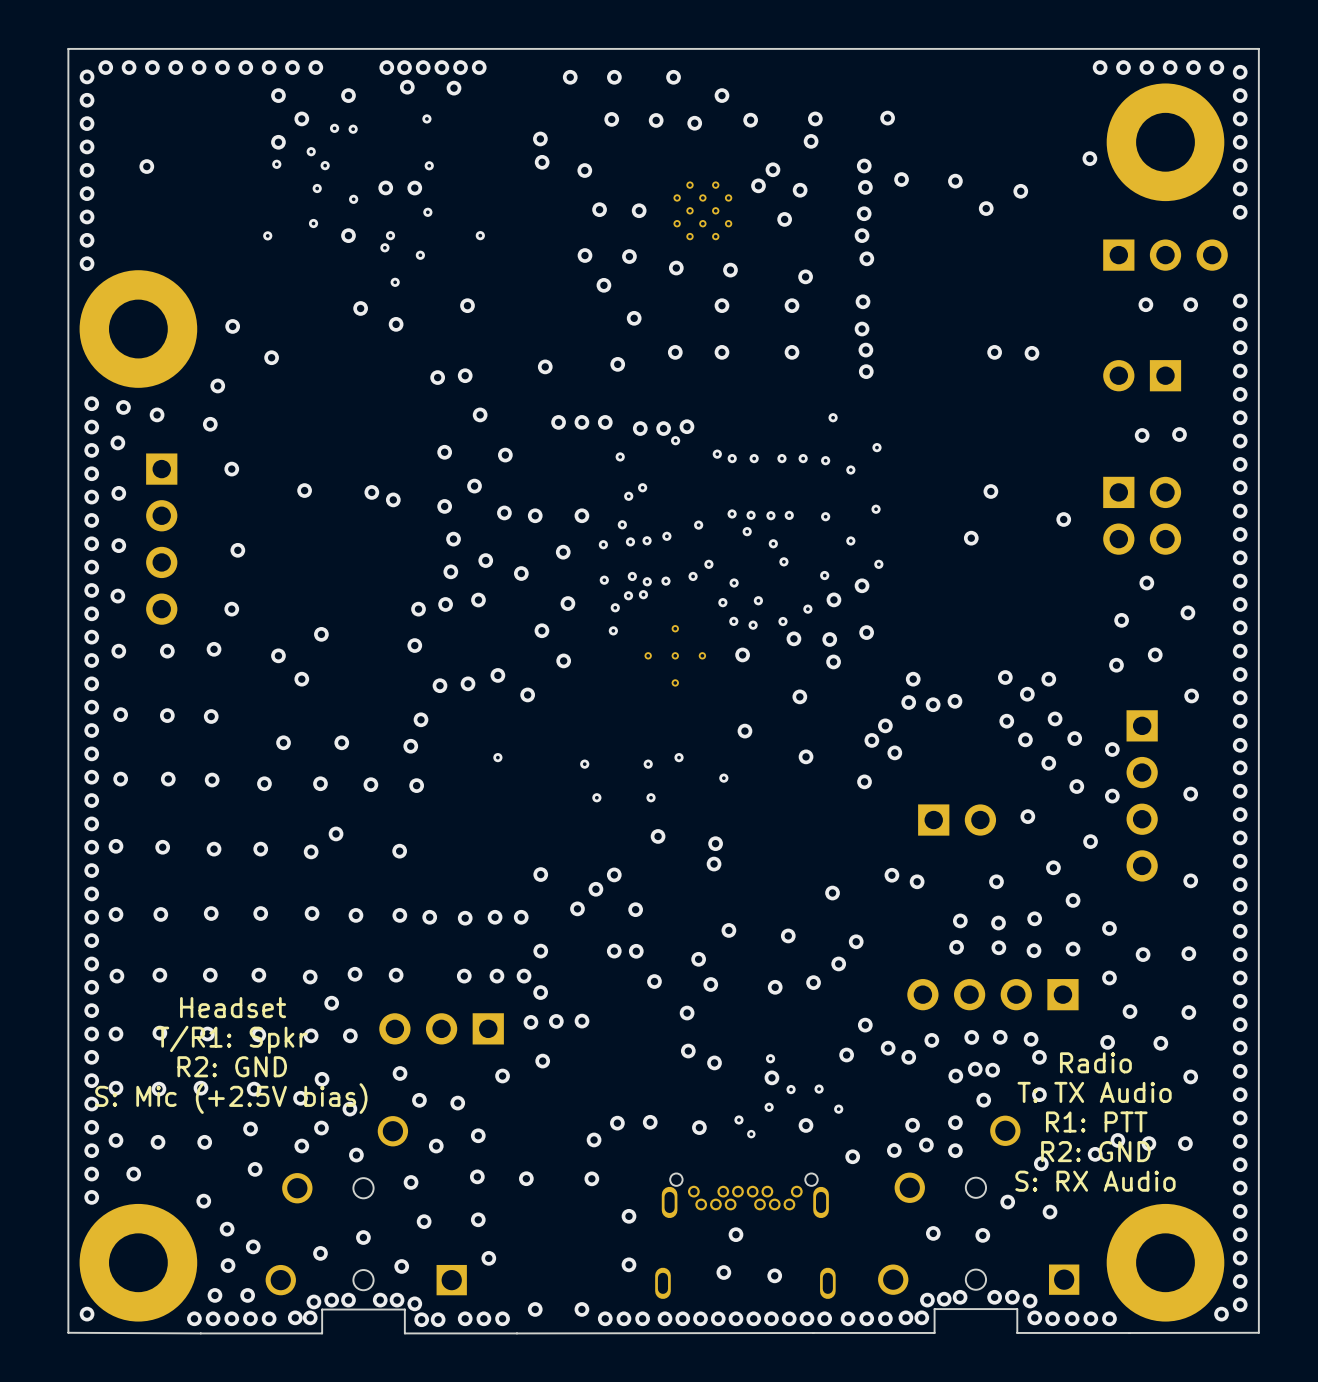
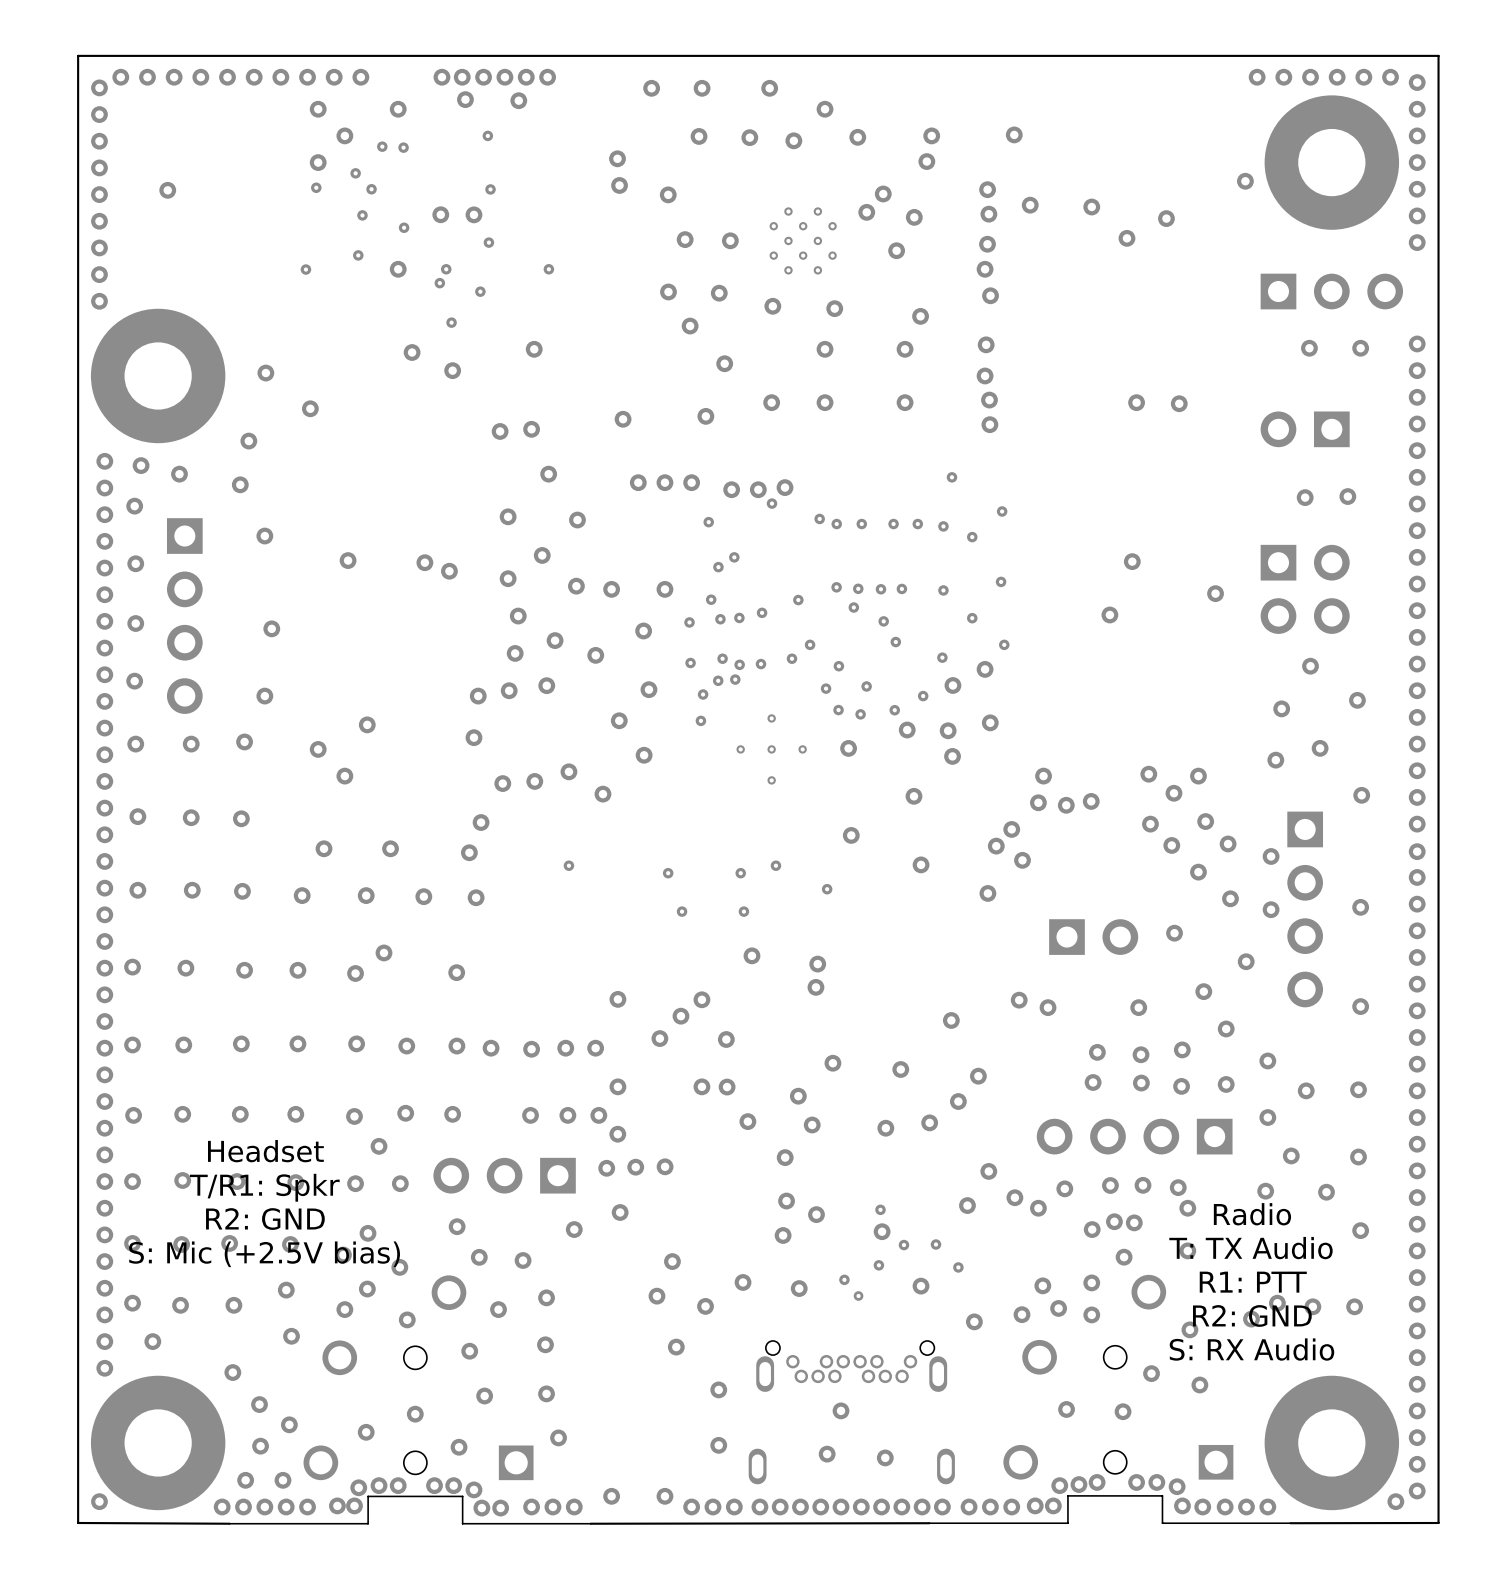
via: none -> (783, 1235)
via: none -> (672, 1261)
via: (617, 1123) -> none
via: none -> (656, 1296)
via: (594, 1139) -> none
via: none -> (705, 1306)
via: (526, 1178) -> none

